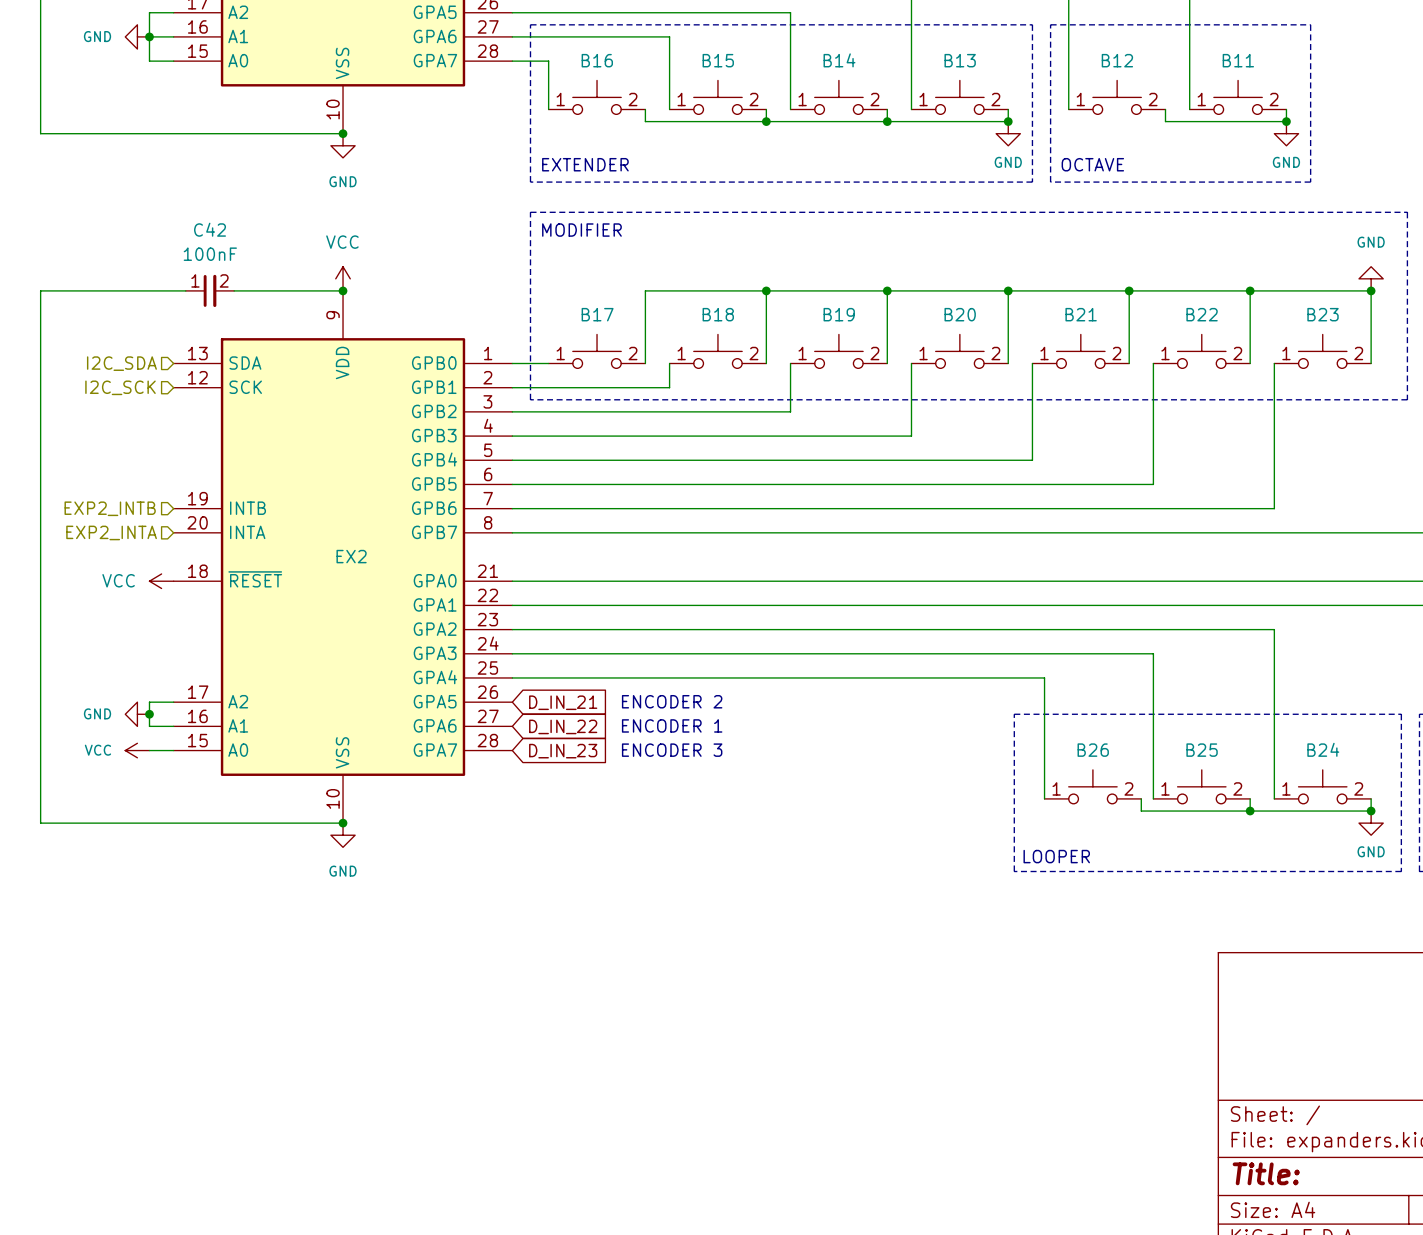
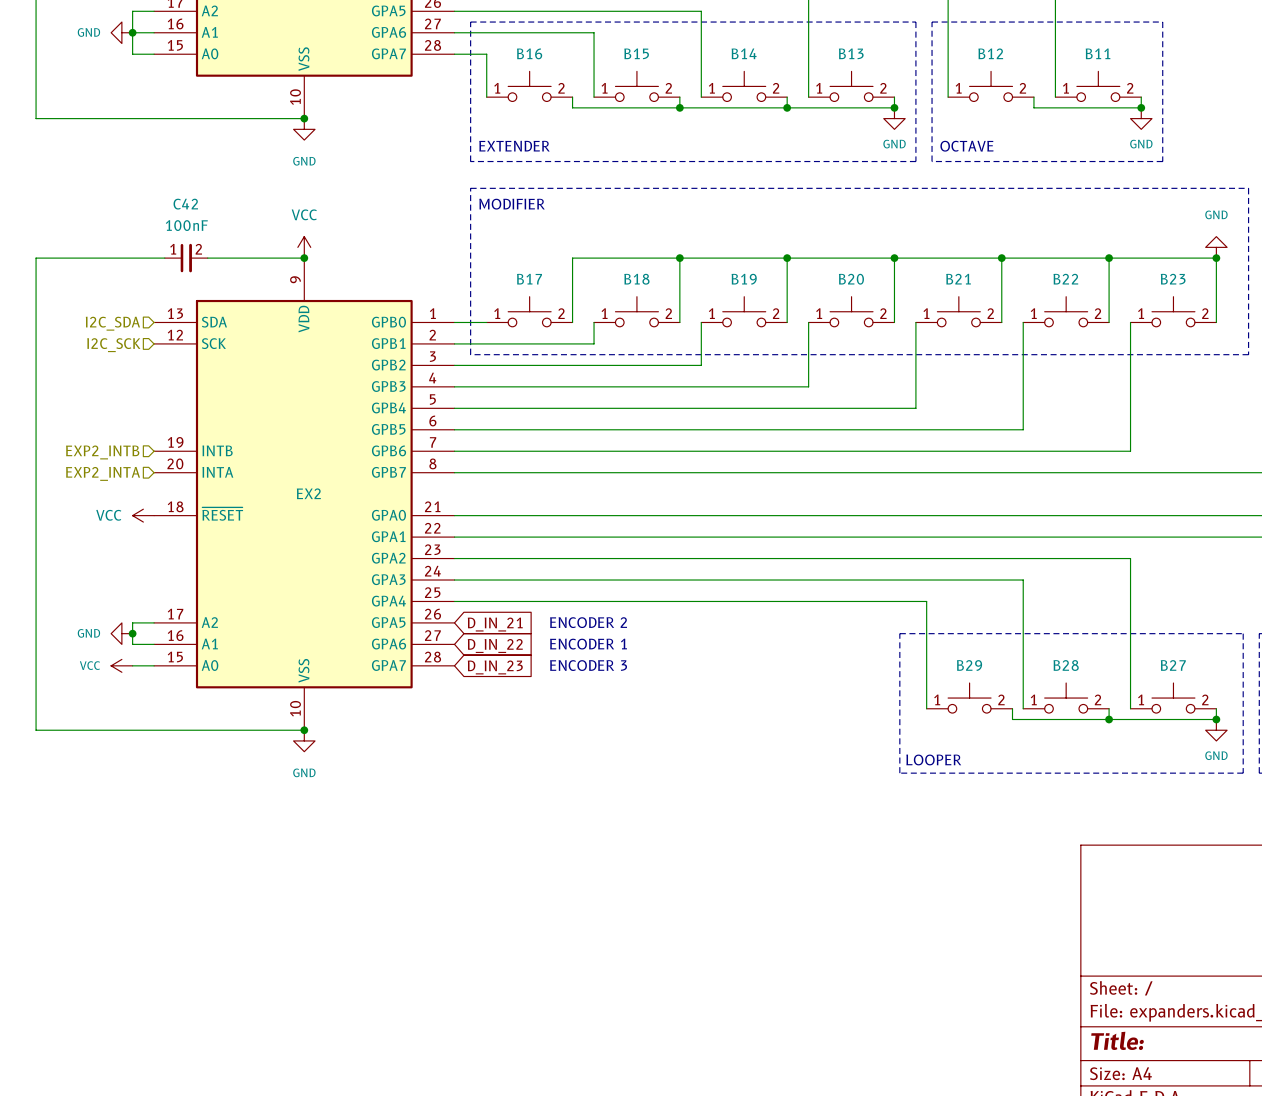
B24 name: B24 (1323, 749) -> B27 (1173, 665)
B26 name: B26 (1093, 750) -> B29 (969, 665)
B25 name: B25 (1202, 750) -> B28 (1066, 665)

